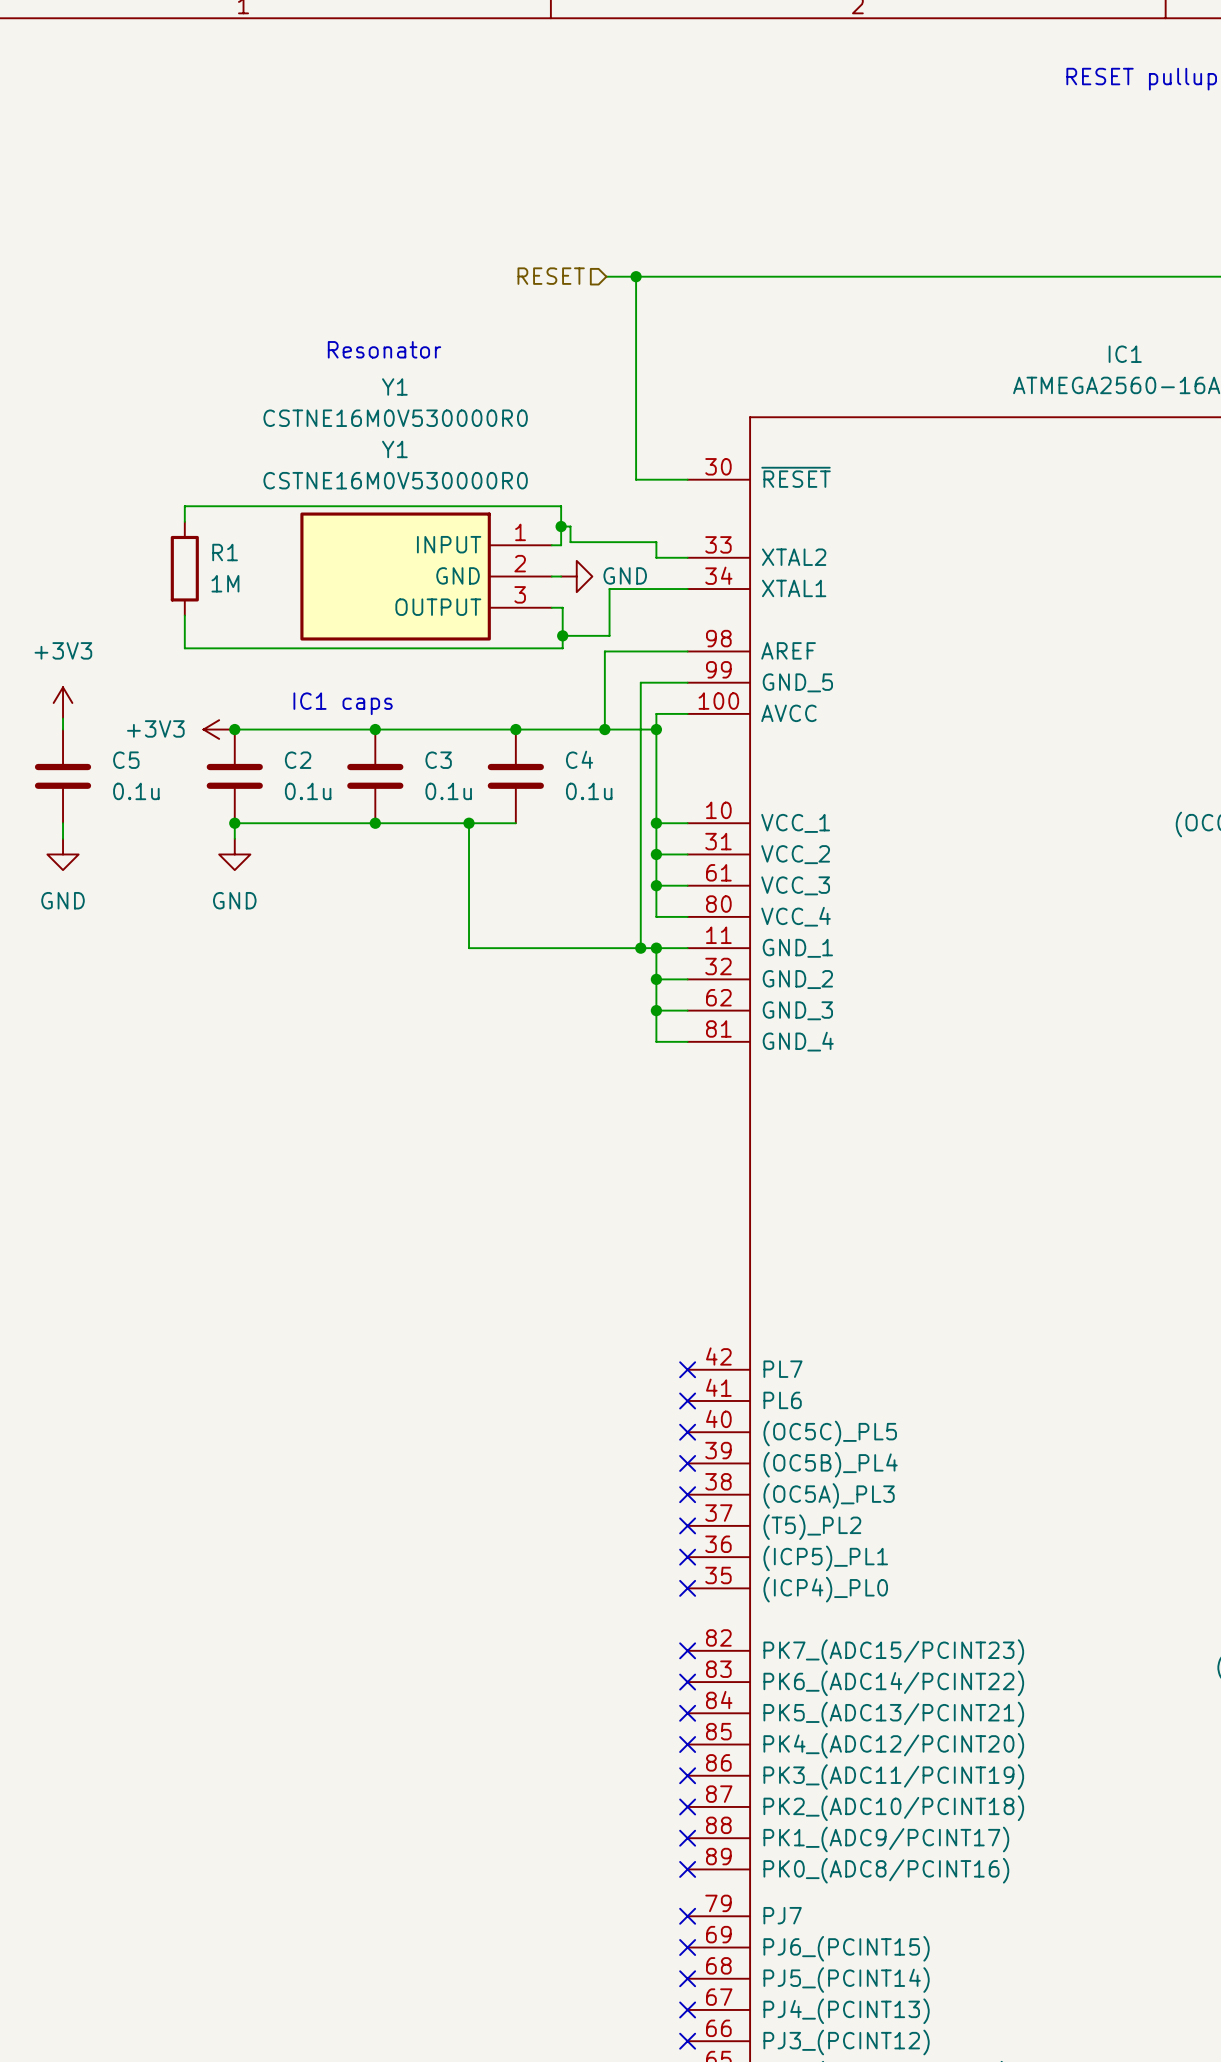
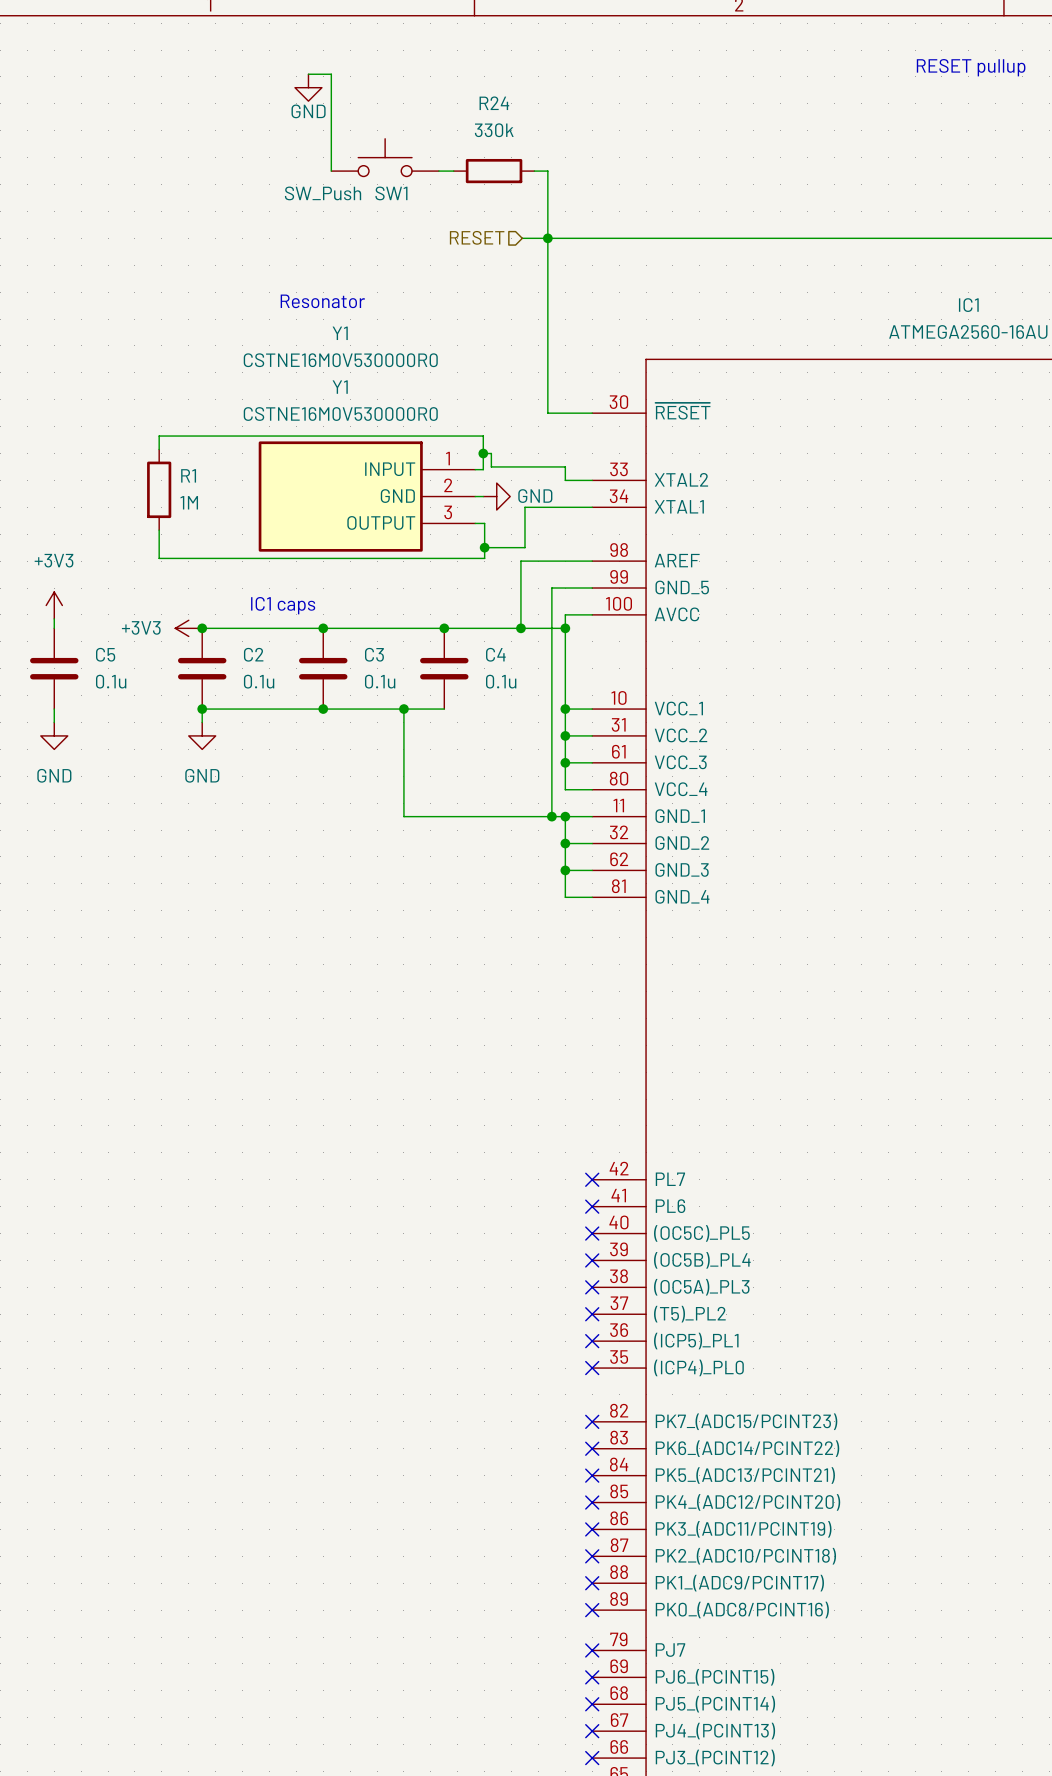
wire: none -> (308, 74) (331, 74) (331, 171)
power symbol: none -> GND (308, 87)
SW1: none -> SW_Push (385, 157)
wire: none -> (438, 171) (453, 171)
R24: none -> 330k (494, 171)
wire: none -> (534, 171) (547, 171) (547, 238)

